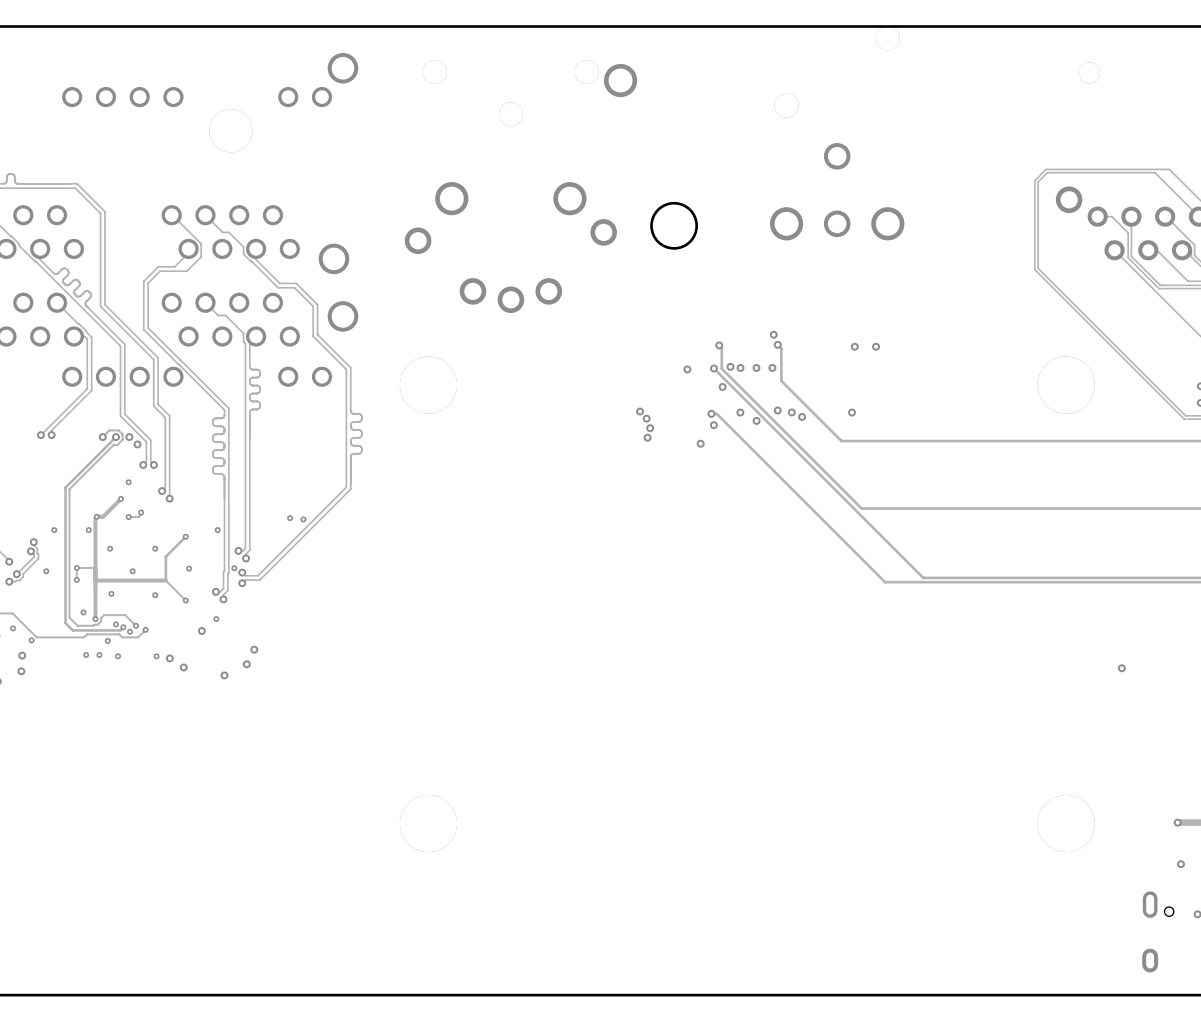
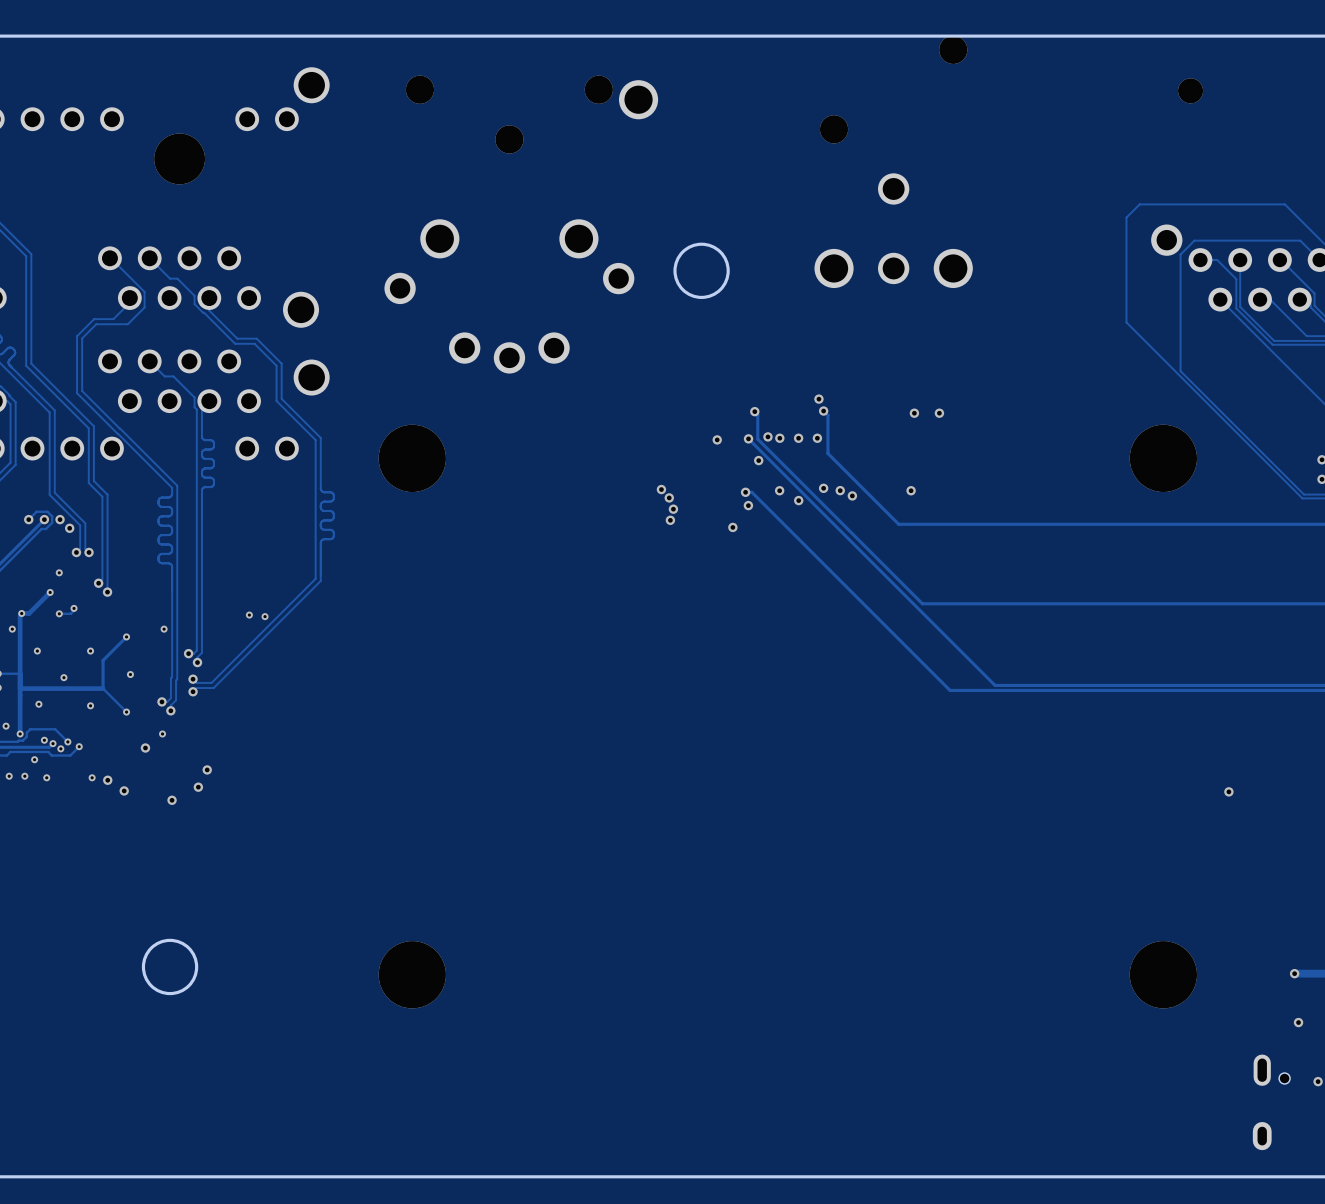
track: (1182, 200) (1154, 172) (1047, 172) (1038, 181) (1038, 268) (1080, 310) -> (1300, 240) (1194, 240) (1180, 254) (1180, 371)
via: (234, 568) -> none
round board edge: none -> [141, 938, 199, 996]

